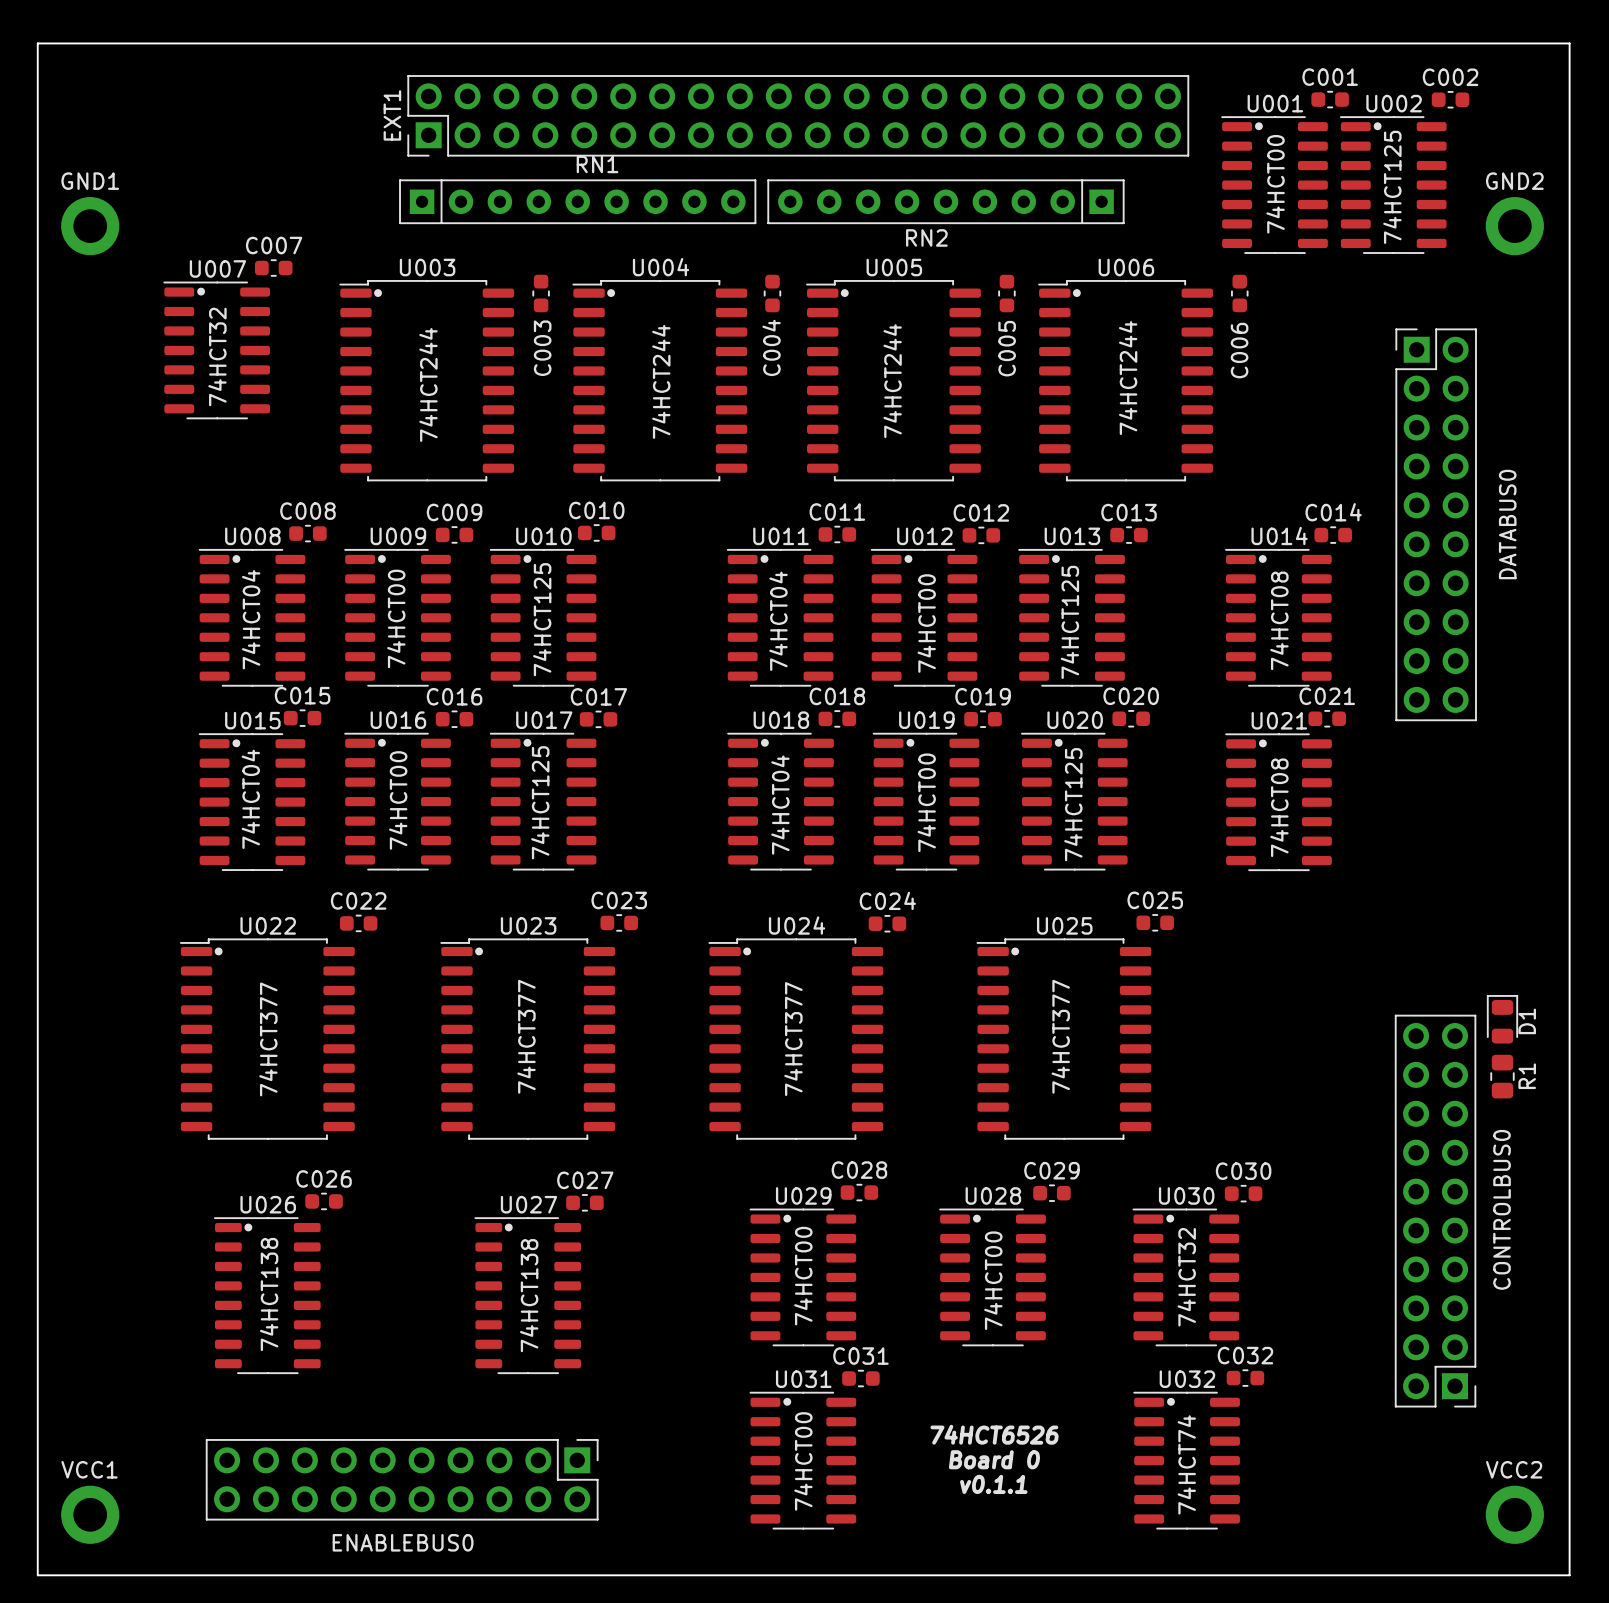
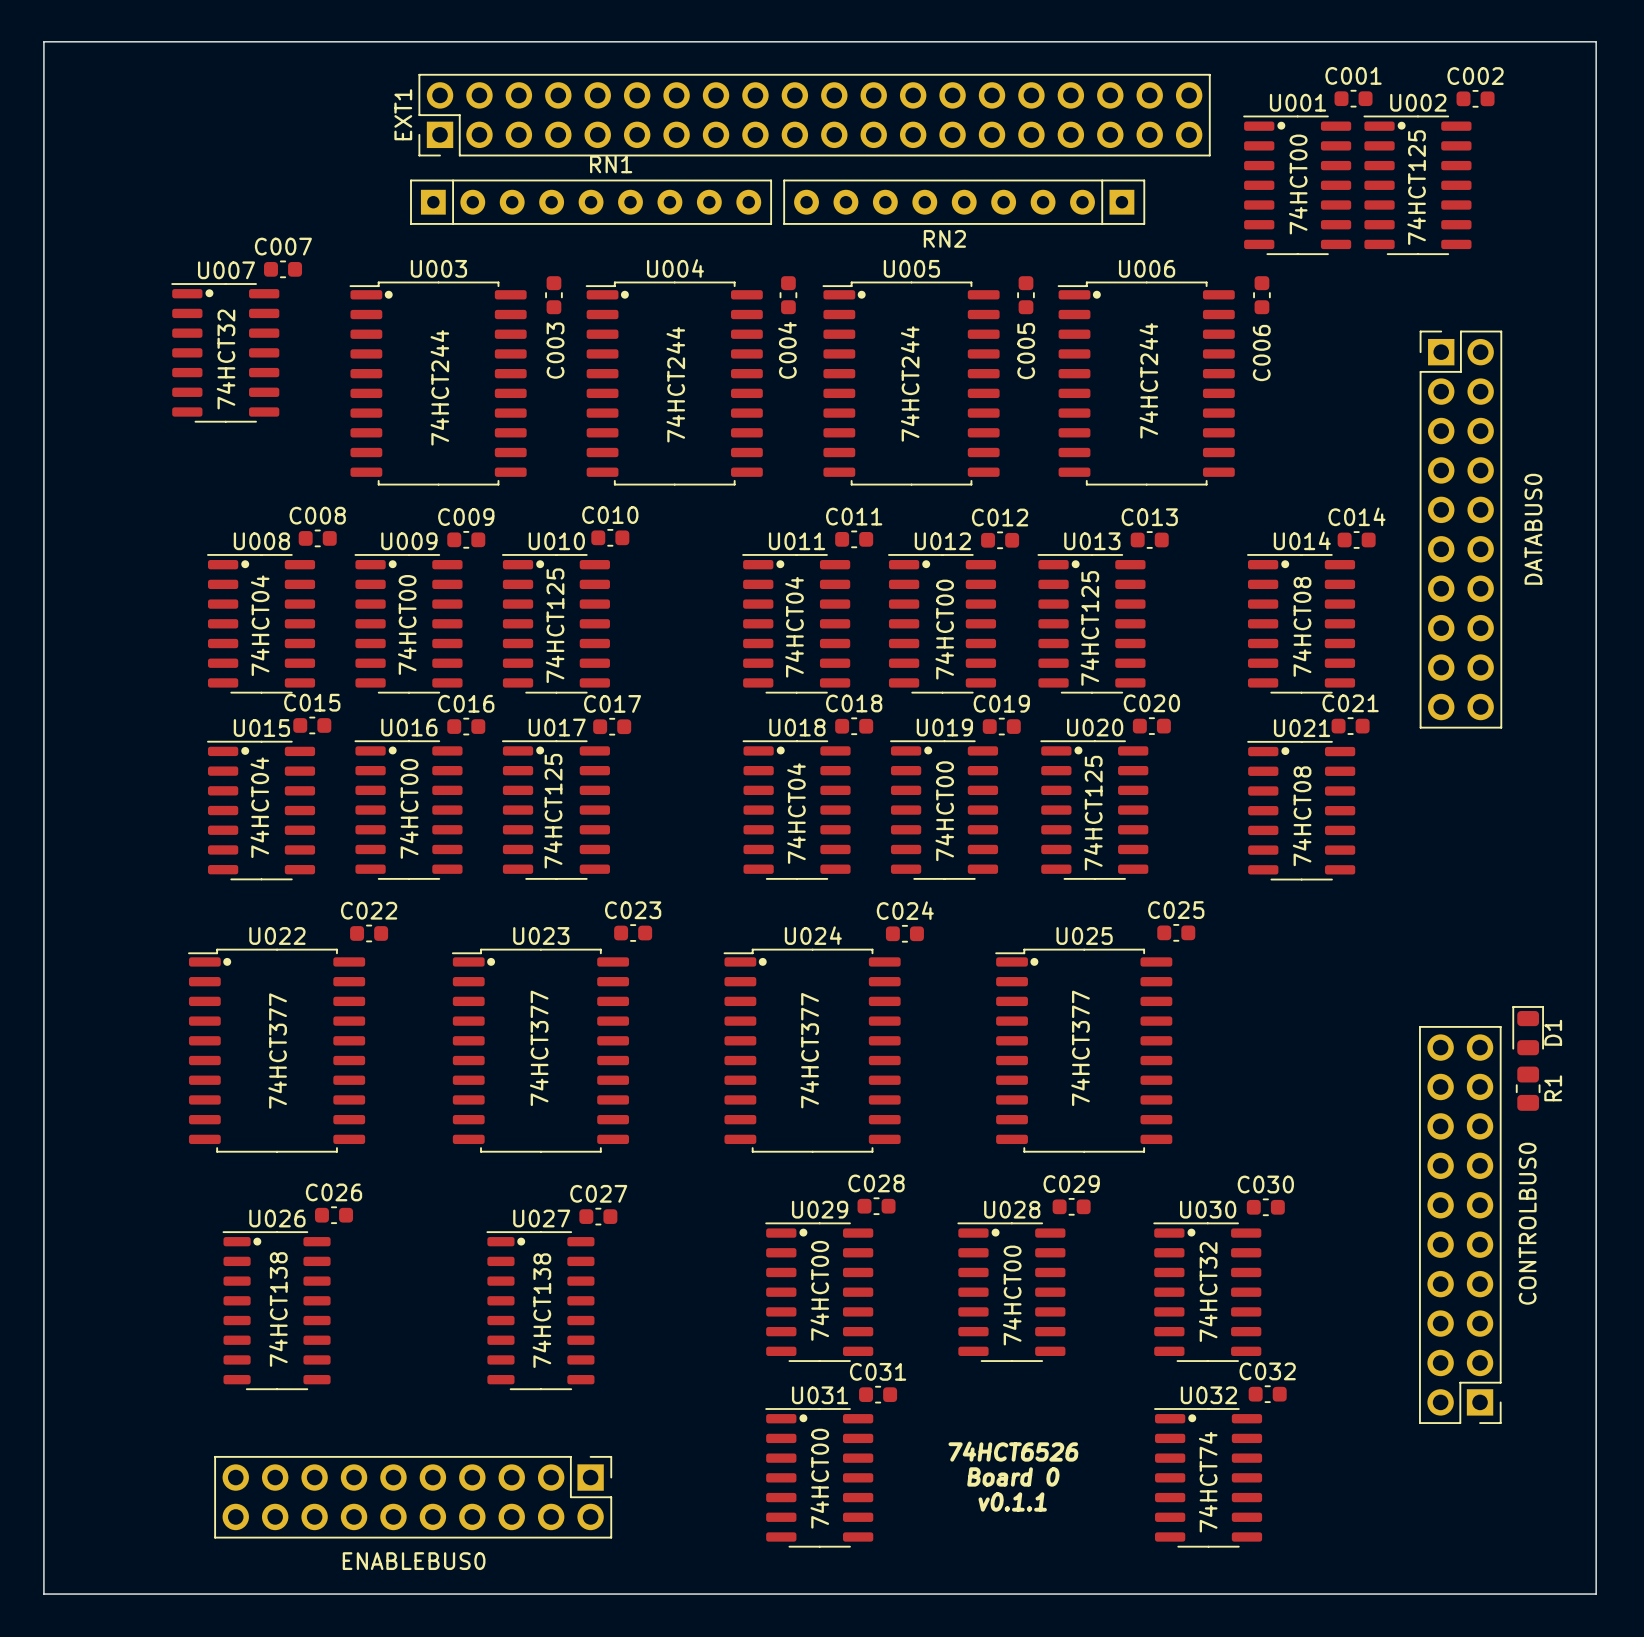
GND1: (90, 226) -> none
GND2: (1514, 226) -> none
VCC1: (90, 1514) -> none
VCC2: (1514, 1514) -> none

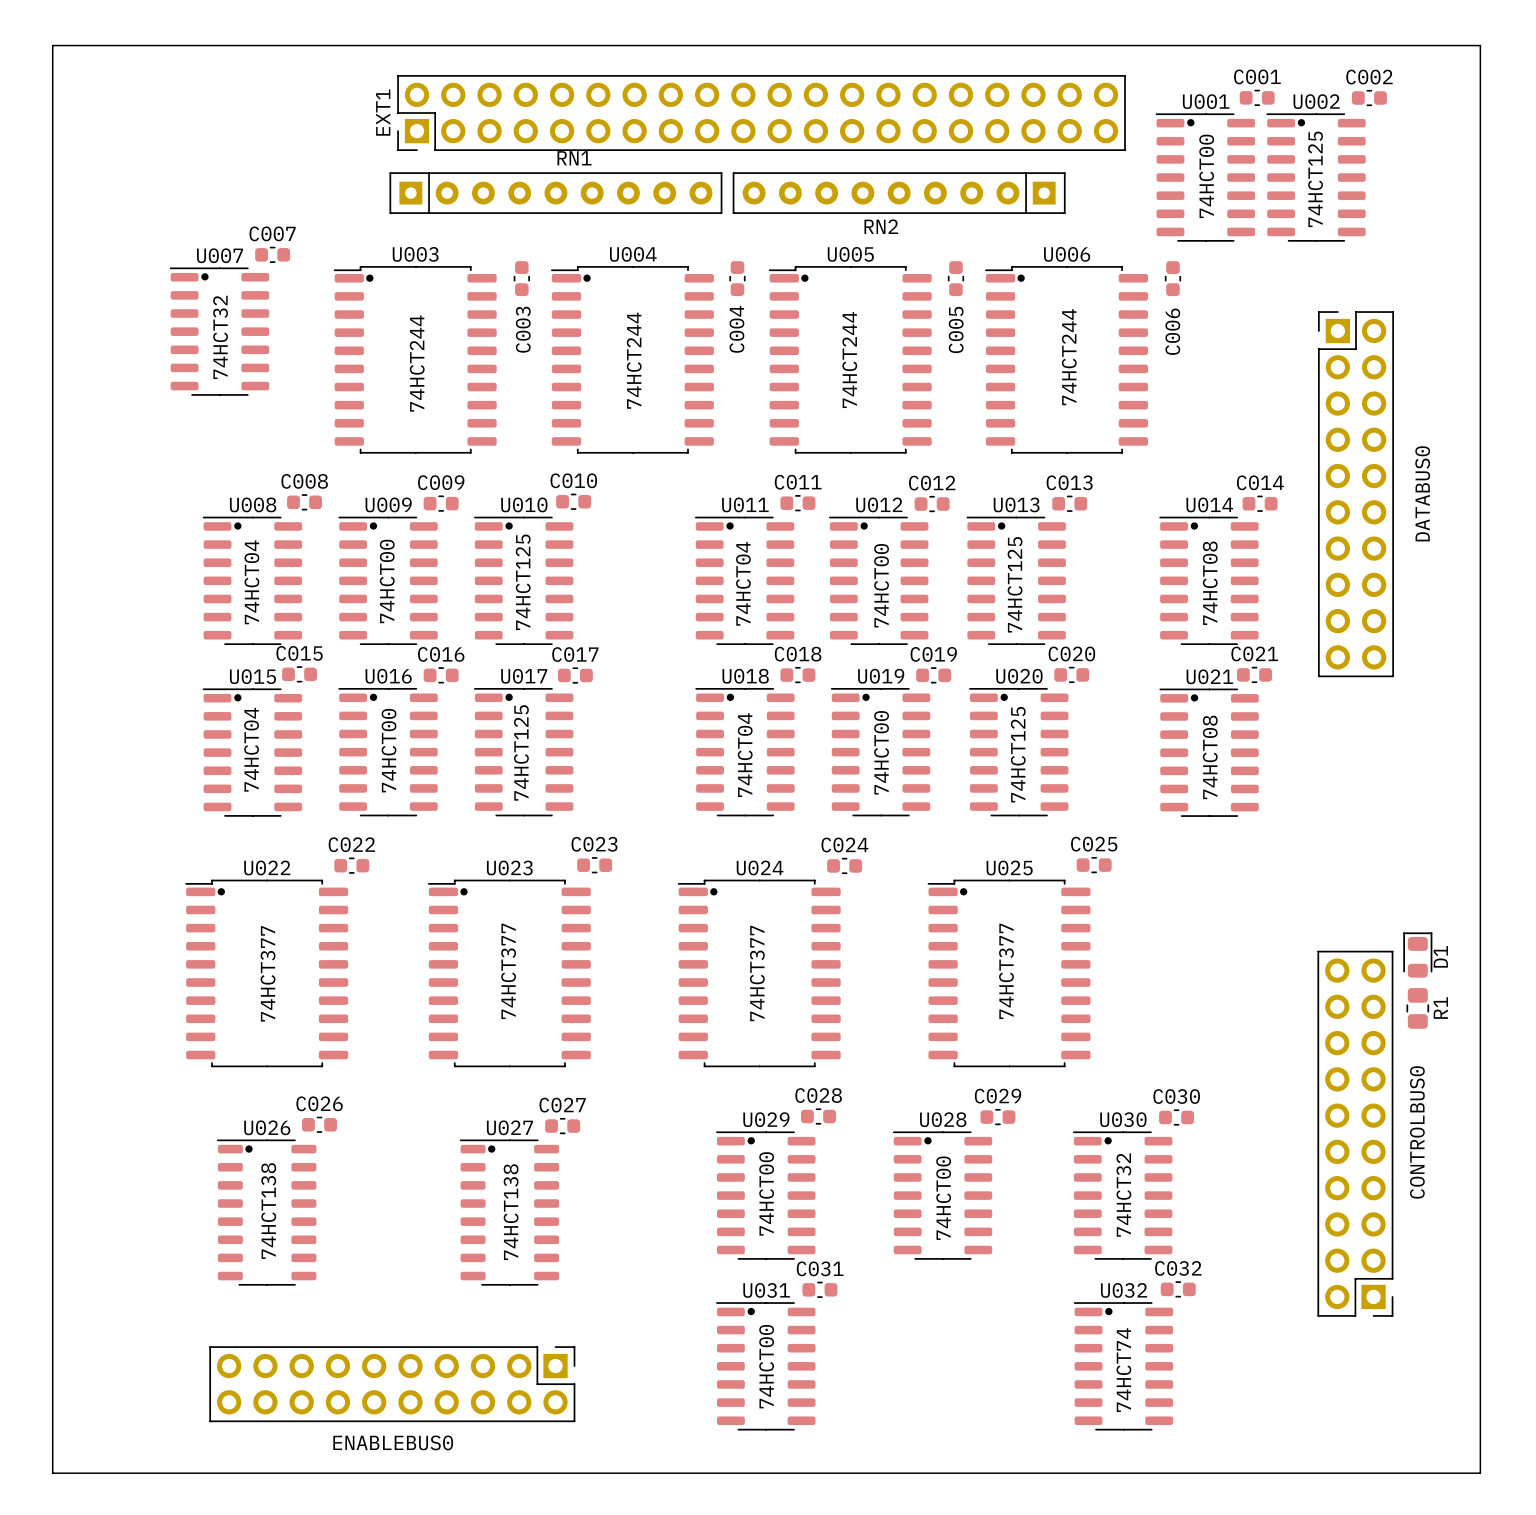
text: 74HCT6526 (1013, 1451) -> none
text: Board 0 (1013, 1476) -> none
text: v0.1.1 (1012, 1501) -> none

